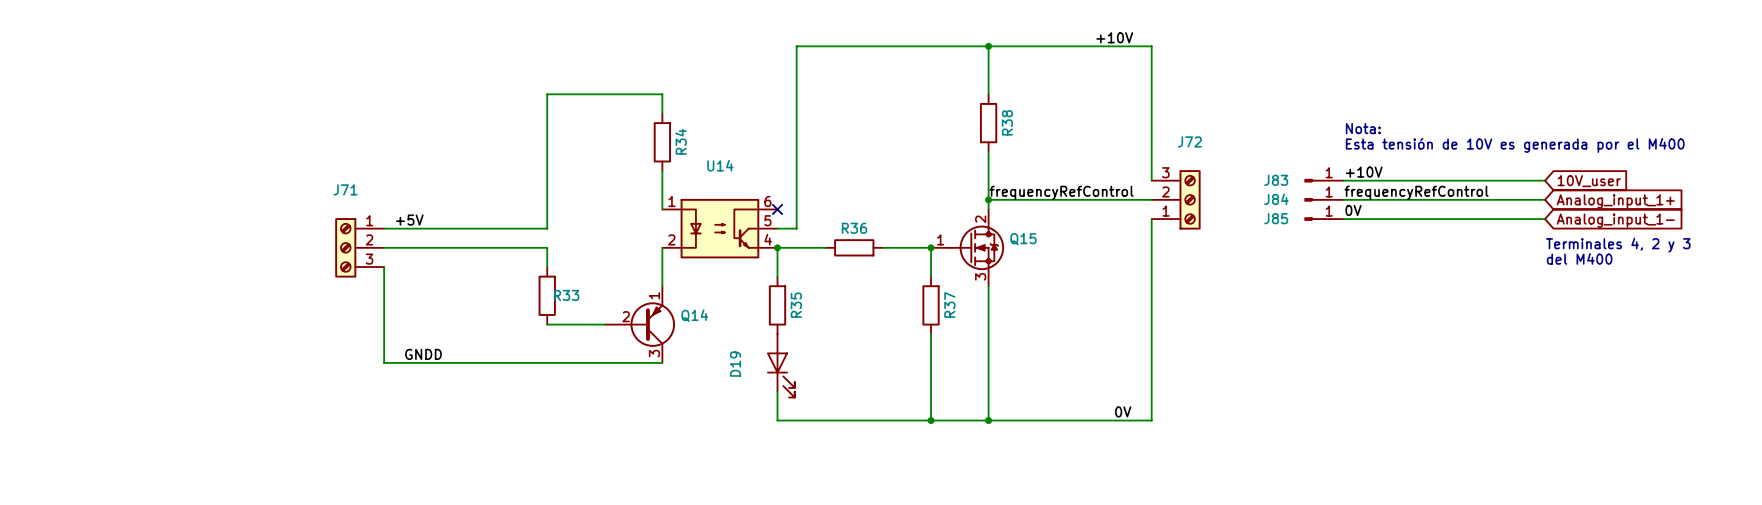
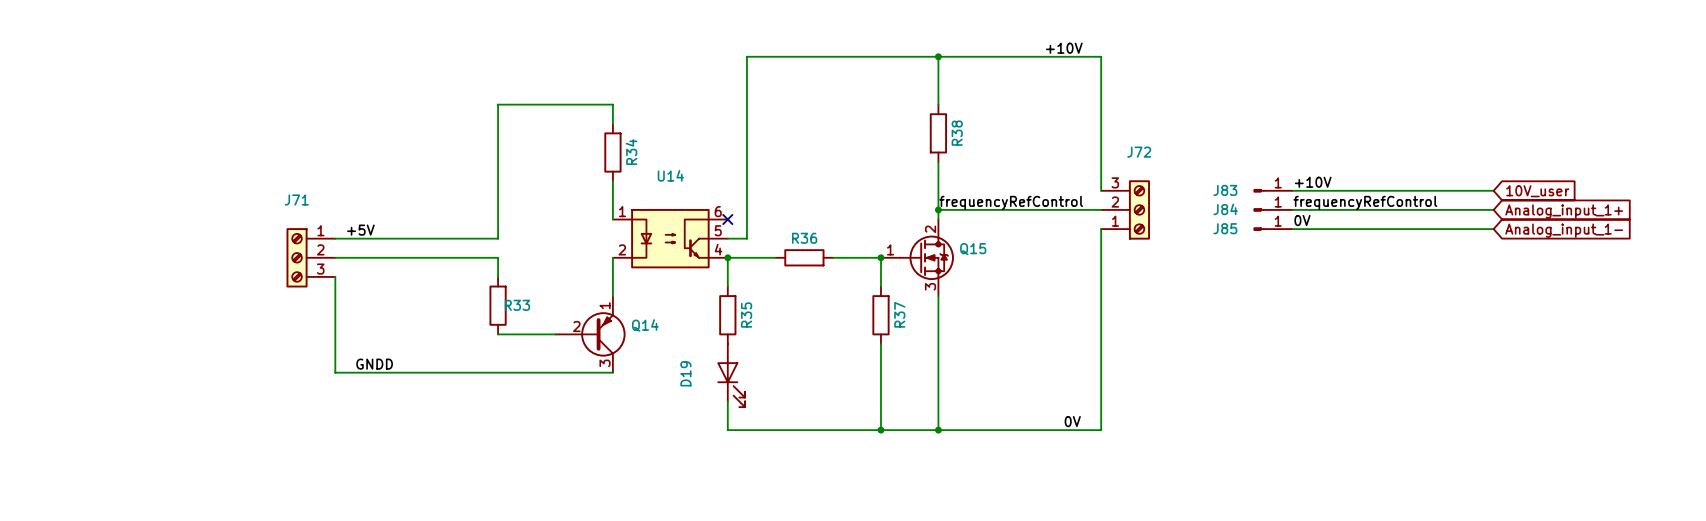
text: Nota: (1363, 128) -> none
text: Esta tensión de 10V es generada por el M400 (1515, 145) -> none
text: Terminales 4, 2 y 3 (1618, 245) -> none
text: del M400 (1579, 258) -> none

